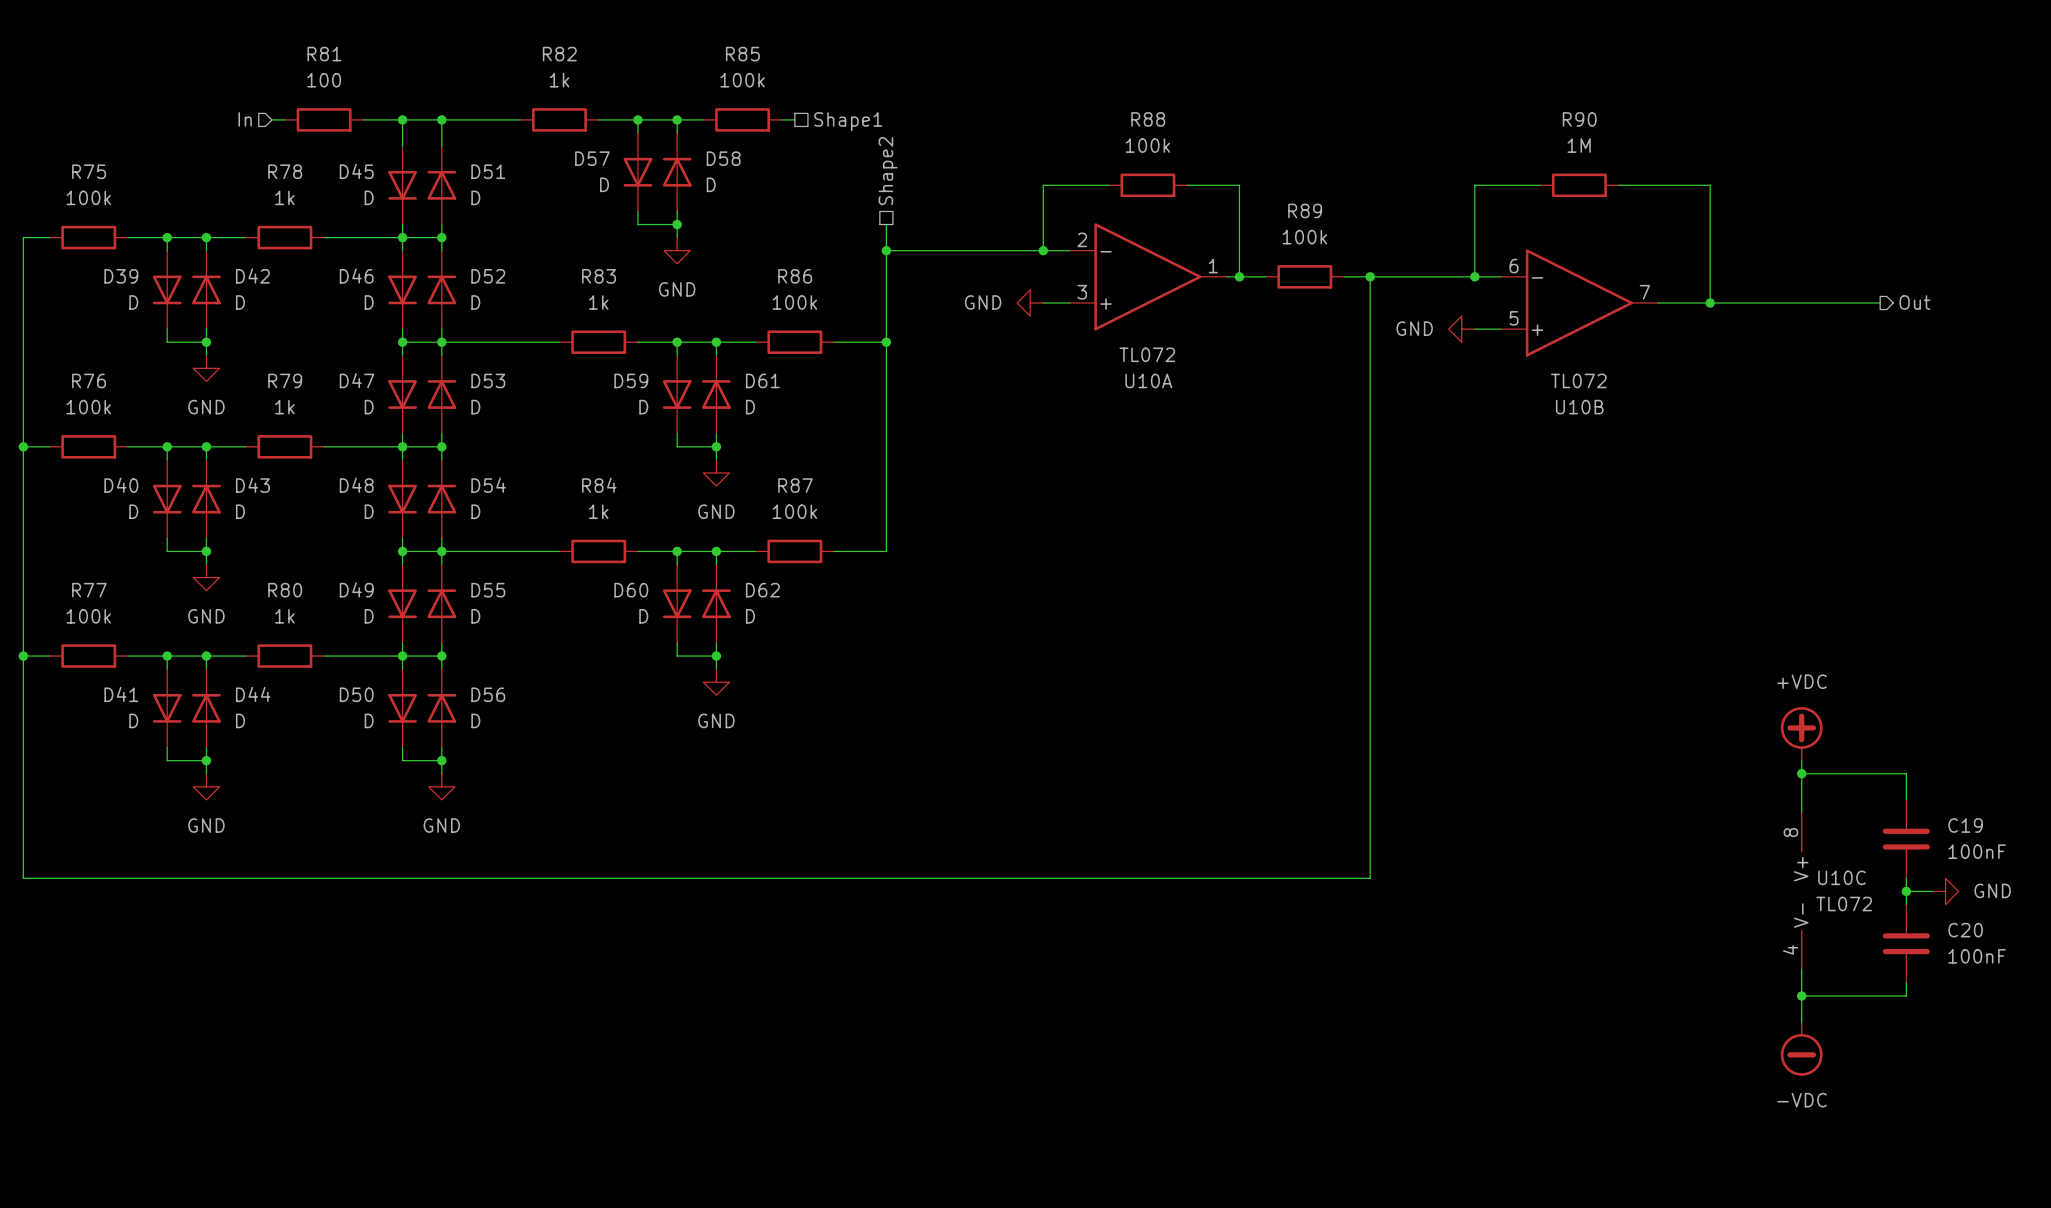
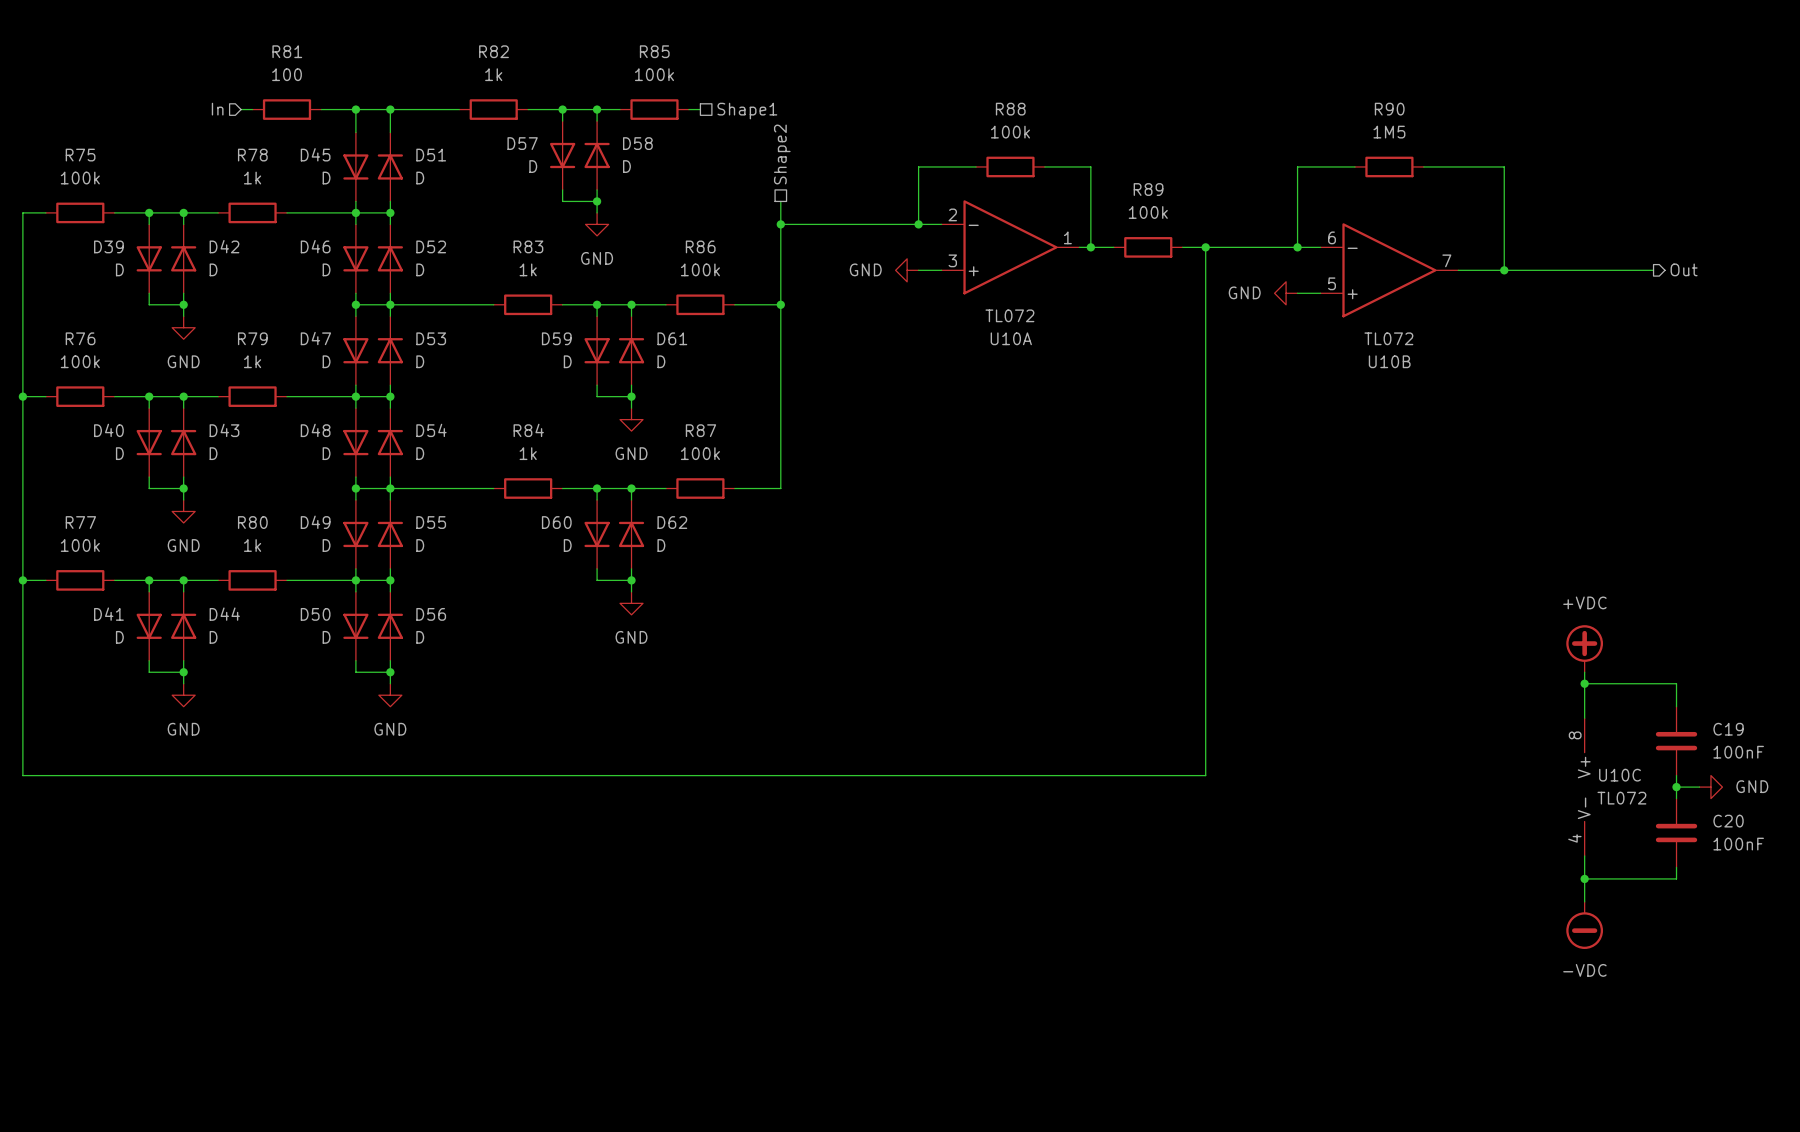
R90 value: 1M (1579, 145) -> 1M5 (1389, 132)

